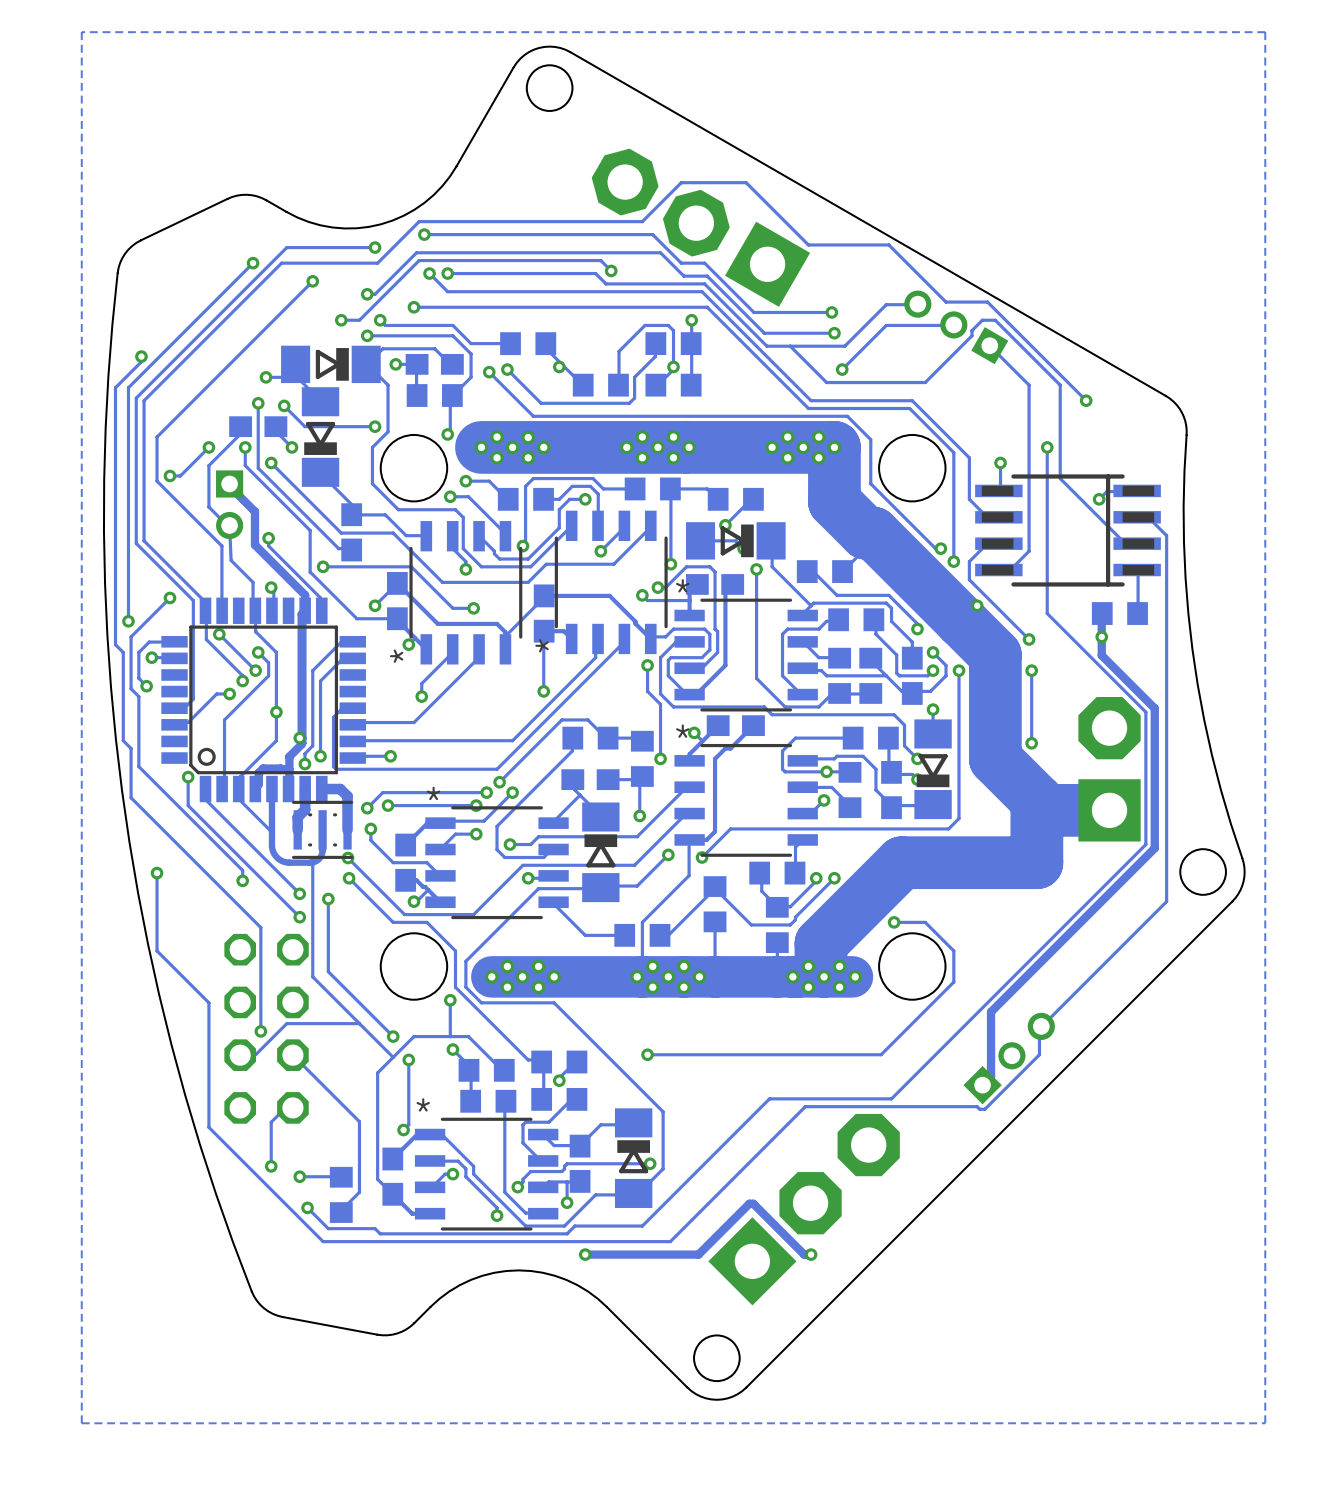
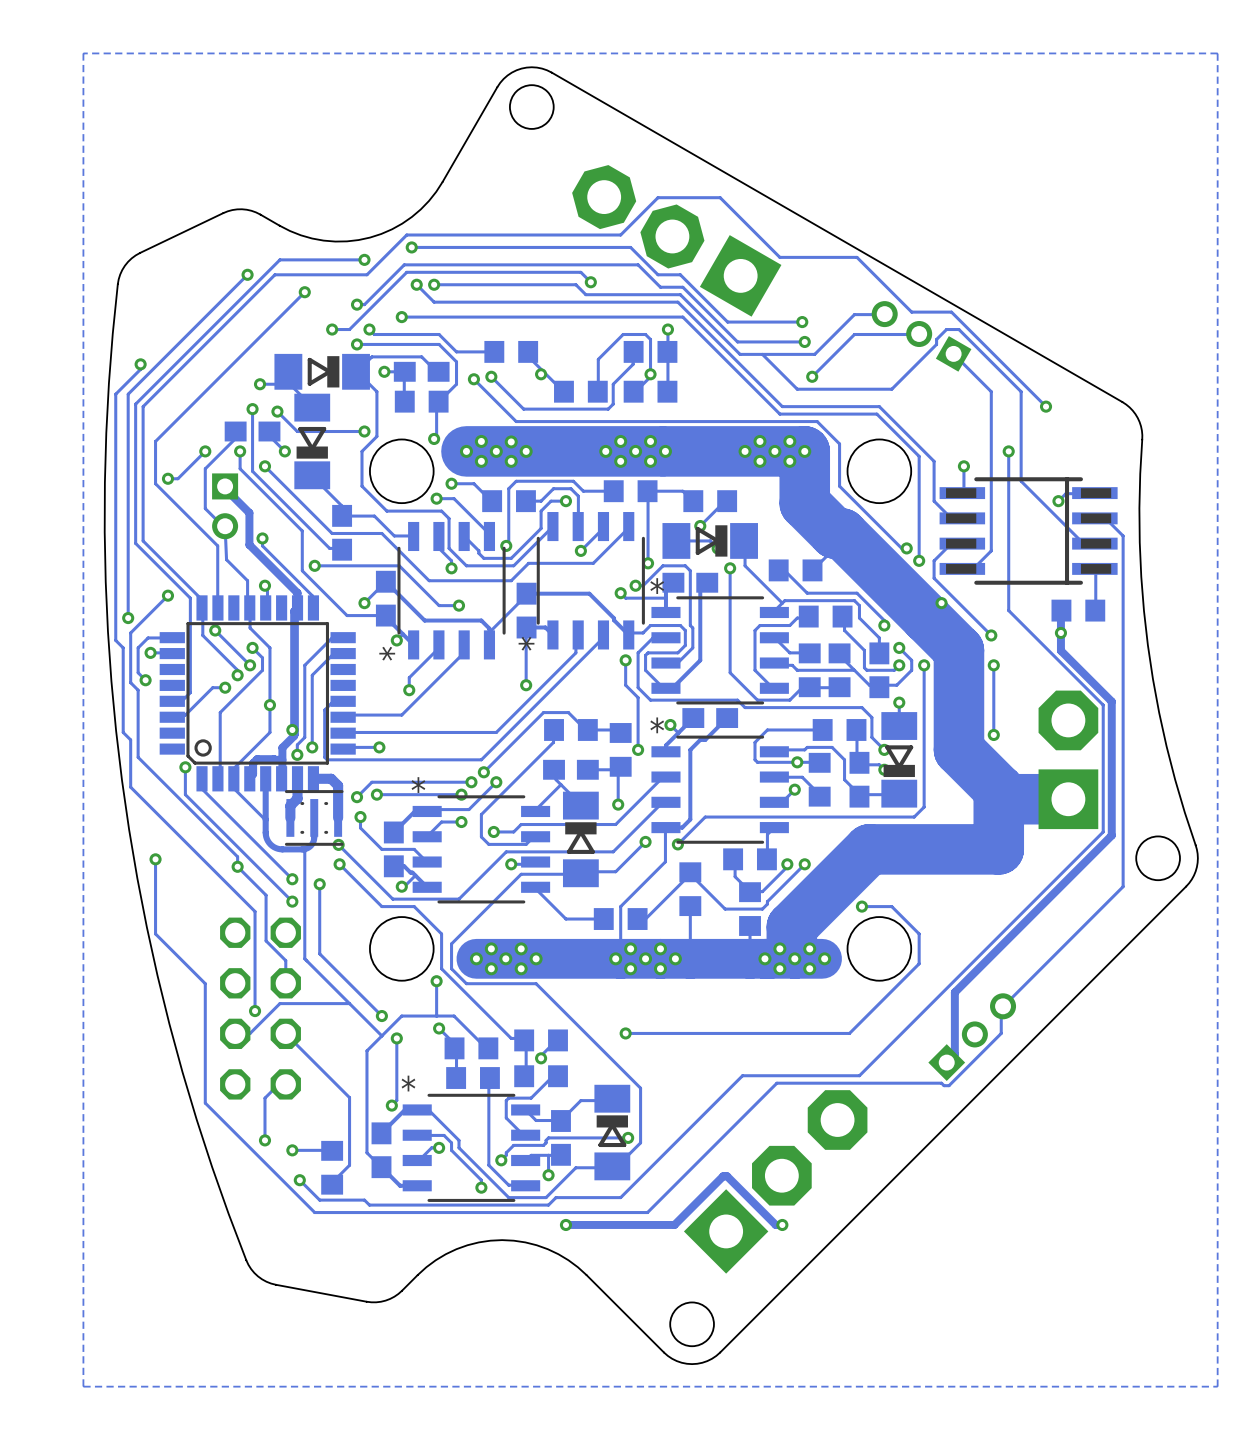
track: none -> (237, 866) (266, 895) (266, 940) (285, 960) (285, 983)

